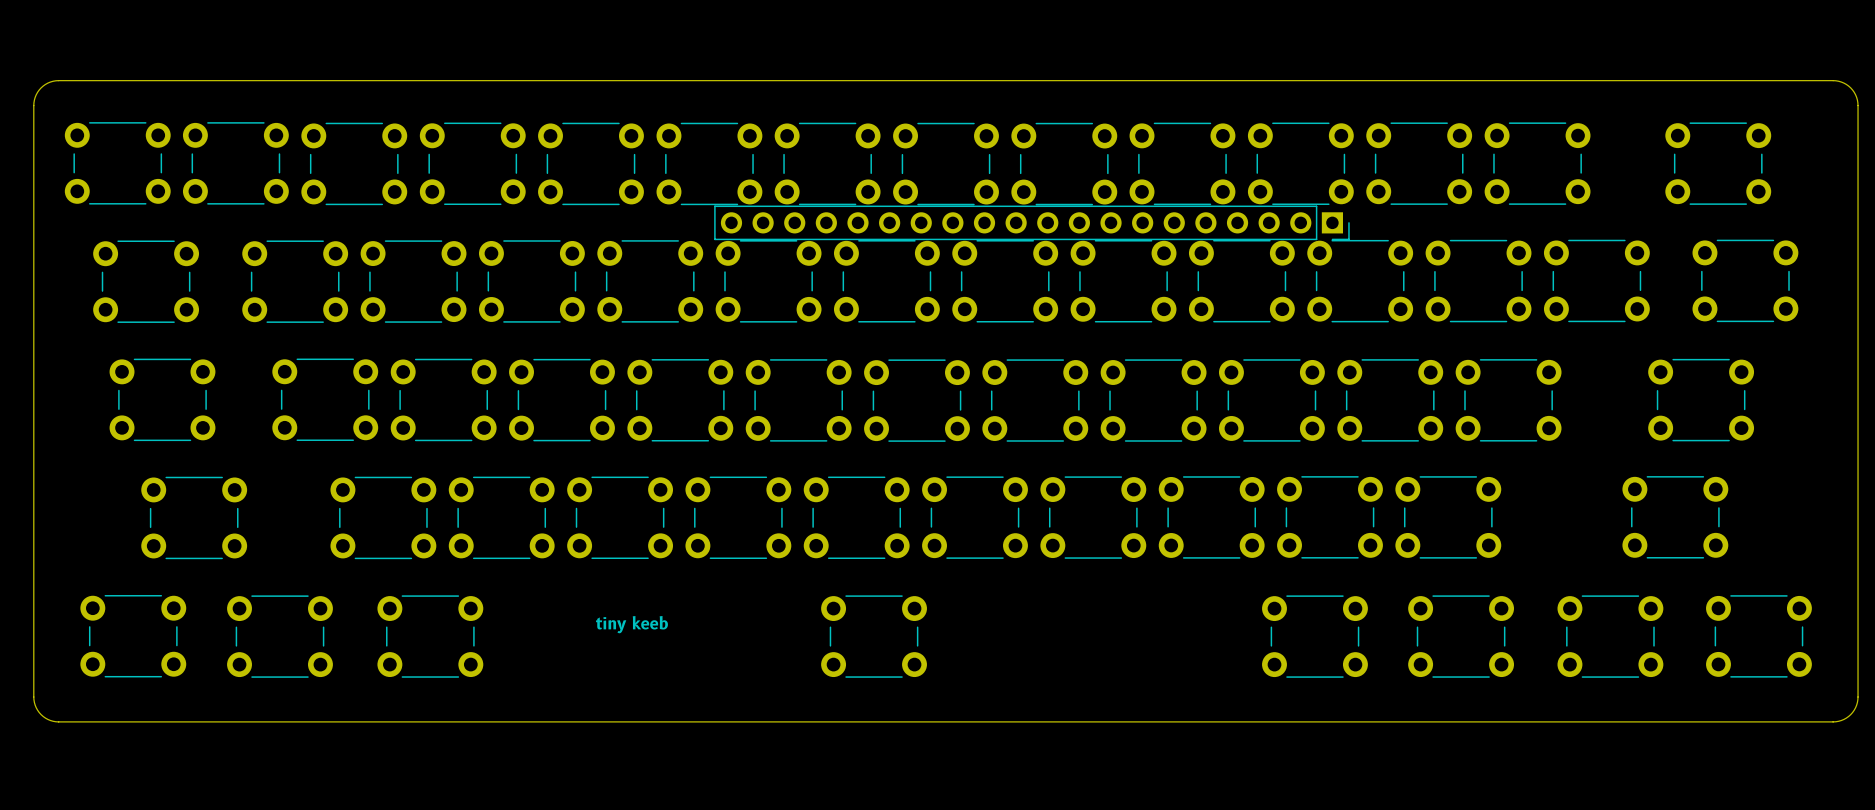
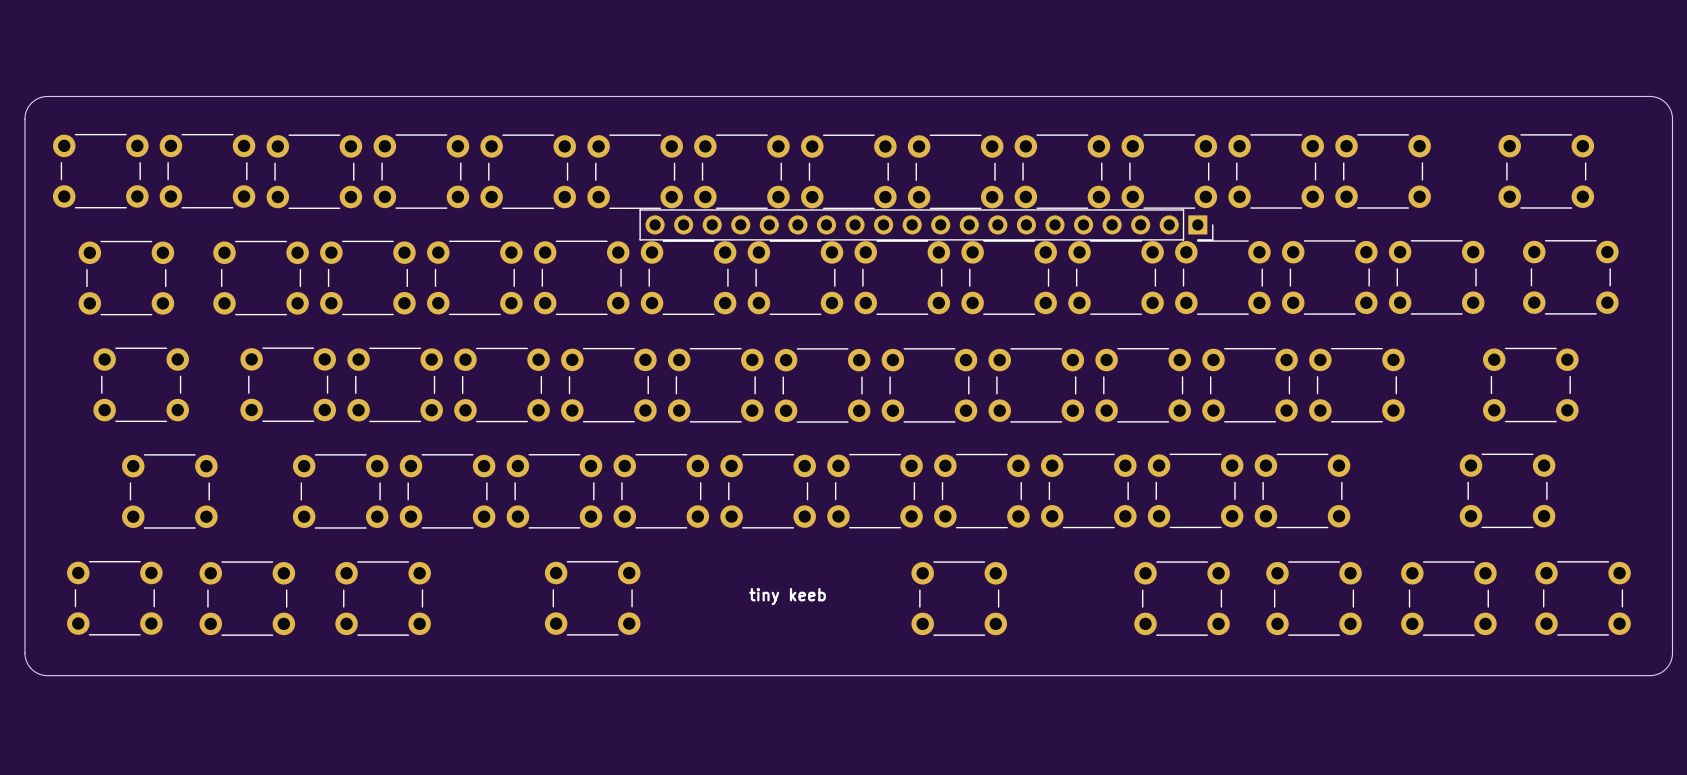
text position: tiny keeb (631, 624) -> tiny keeb (787, 596)
part: none -> (592, 598)
part: (874, 636) -> none
part: none -> (959, 598)

